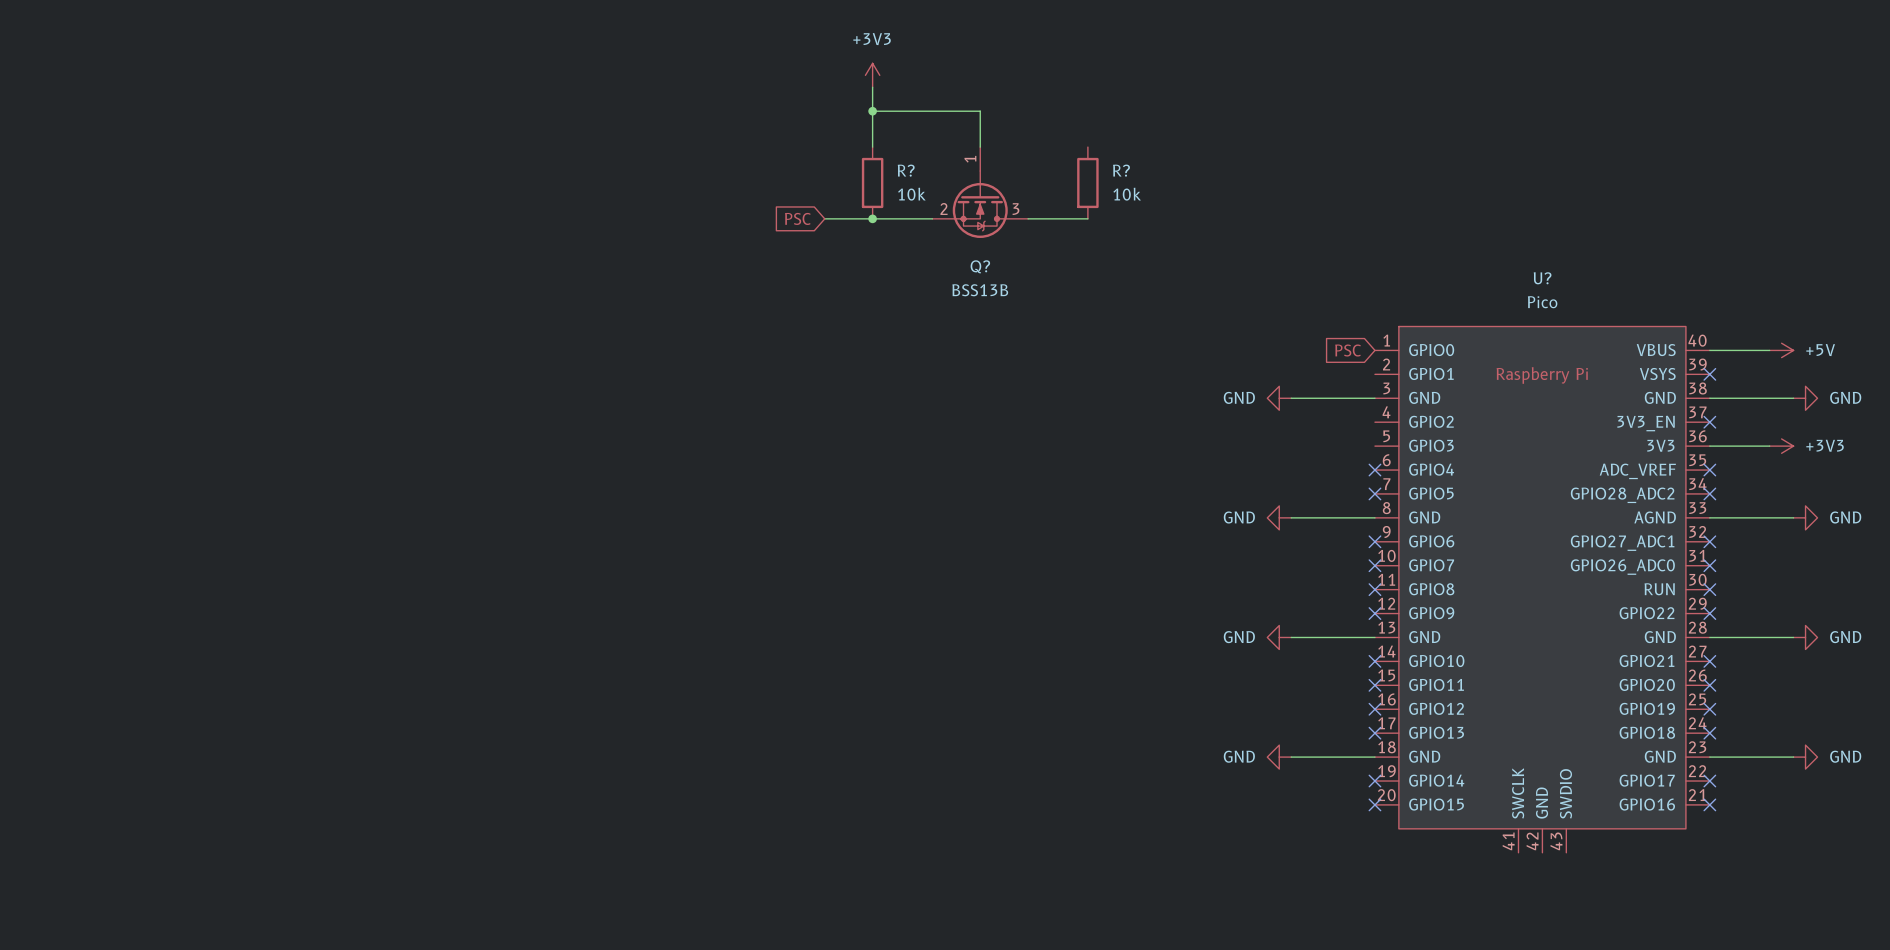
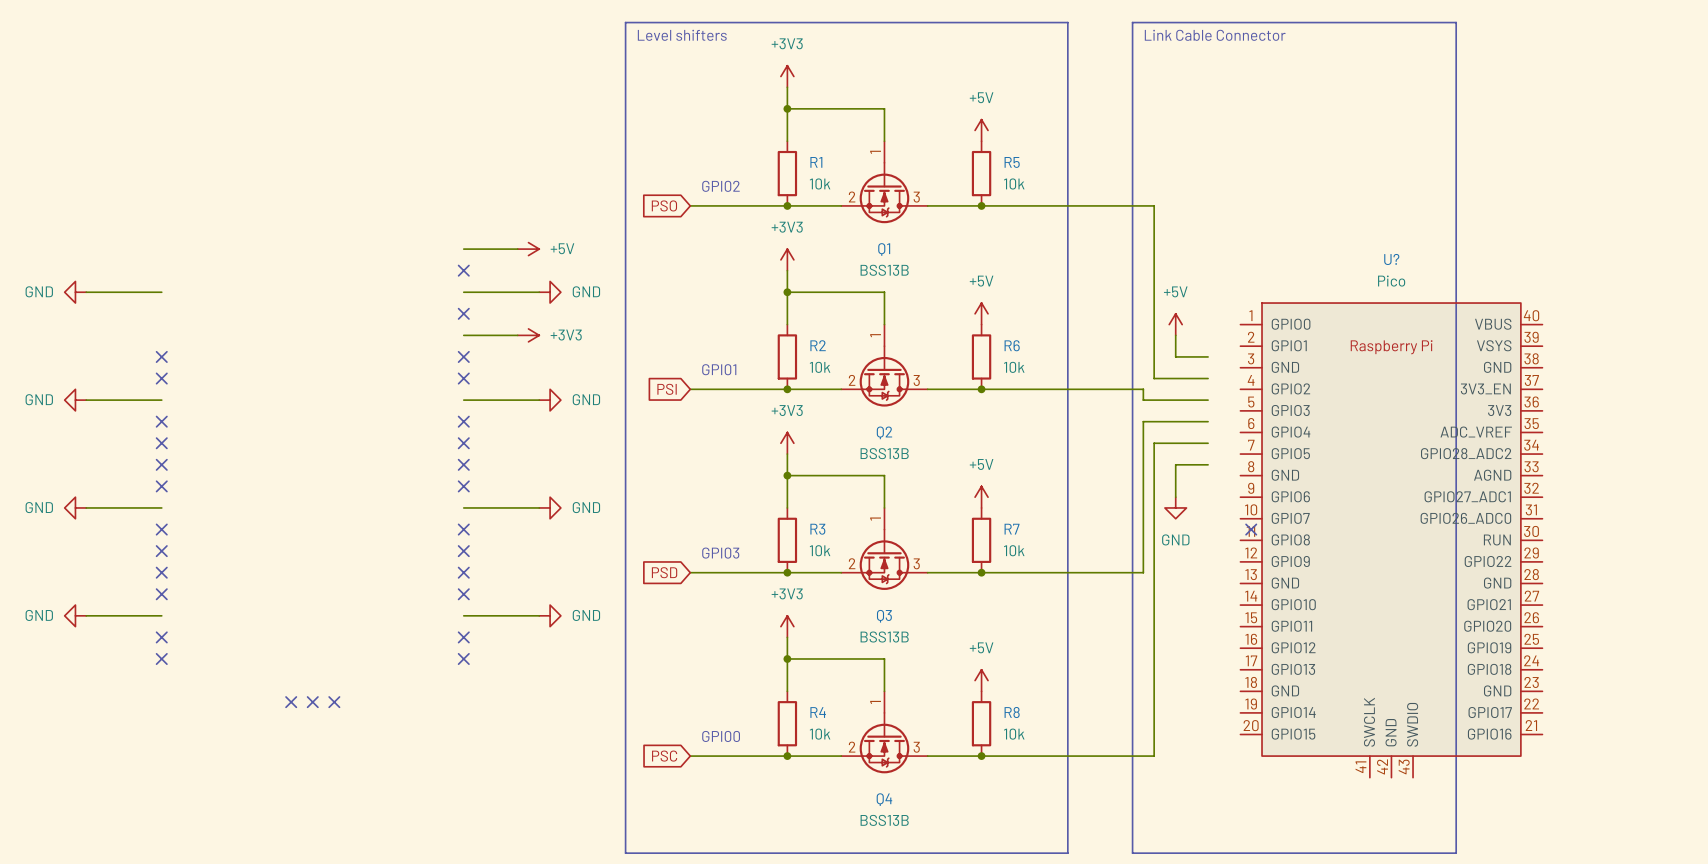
line: none -> (625, 22) (1067, 22) (1067, 853) (625, 853) (625, 22)
line: none -> (1132, 22) (1456, 22) (1456, 853) (1132, 853) (1132, 22)
text: none -> Level shifters (682, 35)
text: none -> Link Cable Connector (1215, 35)
power symbol: none -> +5V (981, 130)
R? name: R? (906, 170) -> R1 (816, 162)
R? name: R? (1121, 170) -> R5 (1012, 162)
text: none -> GPI02 (720, 186)
wire: none -> (690, 205) (744, 205)
global label: PSC (797, 218) -> PSO (664, 205)
wire: none -> (981, 205) (1154, 205) (1154, 378) (1208, 378)
junction: none -> (981, 205)
wire: none -> (463, 249) (517, 249)
power symbol: none -> +5V (528, 249)
Q? name: Q? (980, 266) -> Q1 (884, 249)
power symbol: none -> +3V3 (787, 259)
no-connect mark: none -> (463, 270)
wire: none -> (787, 270) (787, 324)
power symbol: none -> GND (75, 292)
wire: none -> (86, 292) (161, 292)
wire: none -> (463, 292) (539, 292)
power symbol: none -> GND (550, 292)
wire: none -> (787, 292) (884, 292) (884, 324)
junction: none -> (787, 292)
no-connect mark: none -> (463, 313)
power symbol: none -> +5V (981, 313)
power symbol: none -> +5V (1175, 324)
global label: PSC (1348, 350) -> none
wire: (1709, 350) (1769, 350) -> none
power symbol: +5V (1781, 350) -> none
wire: none -> (463, 335) (517, 335)
power symbol: none -> +3V3 (528, 335)
wire: none -> (1175, 335) (1175, 356) (1208, 356)
no-connect mark: (1709, 374) -> none
no-connect mark: none -> (161, 356)
no-connect mark: none -> (463, 356)
R2: none -> 10k (787, 356)
R6: none -> 10k (981, 356)
Q2: none -> BSS13B (884, 365)
power symbol: GND (1279, 398) -> none
wire: (1291, 398) (1374, 398) -> none
wire: (1709, 398) (1793, 398) -> none
power symbol: GND (1805, 398) -> none
text: none -> GPI01 (719, 369)
no-connect mark: none -> (161, 378)
no-connect mark: none -> (463, 378)
global label: none -> PSI (667, 389)
wire: none -> (690, 389) (841, 389)
junction: none -> (787, 389)
wire: none -> (927, 389) (1143, 389) (1143, 400) (1208, 400)
junction: none -> (981, 389)
no-connect mark: (1709, 422) -> none
power symbol: none -> GND (75, 400)
wire: none -> (86, 400) (161, 400)
wire: none -> (463, 400) (539, 400)
power symbol: none -> GND (550, 400)
wire: (1709, 446) (1769, 446) -> none
power symbol: +3V3 (1781, 446) -> none
no-connect mark: none -> (161, 421)
no-connect mark: none -> (463, 421)
wire: none -> (1208, 421) (1143, 421) (1143, 572) (927, 572)
no-connect mark: (1374, 470) -> none
no-connect mark: (1709, 470) -> none
no-connect mark: none -> (161, 443)
no-connect mark: none -> (463, 443)
power symbol: none -> +3V3 (787, 443)
wire: none -> (1208, 443) (1154, 443) (1154, 756) (927, 756)
wire: none -> (787, 454) (787, 507)
no-connect mark: (1374, 493) -> none
no-connect mark: (1709, 493) -> none
no-connect mark: none -> (161, 464)
no-connect mark: none -> (463, 464)
wire: none -> (1208, 464) (1175, 464) (1175, 497)
wire: none -> (787, 475) (884, 475) (884, 507)
junction: none -> (787, 475)
power symbol rotation: 0° (1279, 517) -> 90° counterclockwise (1175, 507)
power symbol position: GND (1279, 517) -> GND (1175, 507)
wire: (1291, 517) (1374, 517) -> none
wire: (1709, 517) (1793, 517) -> none
power symbol: GND (1805, 517) -> none
no-connect mark: none -> (161, 486)
no-connect mark: none -> (463, 486)
power symbol: none -> +5V (981, 497)
no-connect mark: (1374, 541) -> none
no-connect mark: (1709, 541) -> none
power symbol: none -> GND (75, 507)
wire: none -> (86, 507) (161, 507)
wire: none -> (463, 507) (539, 507)
power symbol: none -> GND (550, 507)
no-connect mark: (1374, 565) -> none
no-connect mark: (1709, 565) -> none
no-connect mark: none -> (161, 529)
no-connect mark: none -> (463, 529)
no-connect mark: none -> (1251, 529)
R3: none -> 10k (787, 540)
R7: none -> 10k (981, 540)
no-connect mark: (1374, 589) -> none
no-connect mark: (1709, 589) -> none
Q3: none -> BSS13B (884, 548)
no-connect mark: none -> (161, 551)
no-connect mark: none -> (463, 551)
text: none -> GPI03 (720, 553)
no-connect mark: (1374, 613) -> none
no-connect mark: (1709, 613) -> none
no-connect mark: none -> (161, 572)
no-connect mark: none -> (463, 572)
global label: none -> PSD (664, 572)
wire: none -> (690, 572) (841, 572)
junction: none -> (787, 572)
junction: none -> (981, 572)
power symbol: GND (1279, 637) -> none
wire: (1291, 637) (1374, 637) -> none
wire: (1709, 637) (1793, 637) -> none
power symbol: GND (1805, 637) -> none
no-connect mark: none -> (161, 594)
no-connect mark: none -> (463, 594)
no-connect mark: (1374, 661) -> none
no-connect mark: (1709, 661) -> none
power symbol: none -> GND (75, 615)
wire: none -> (86, 615) (161, 615)
wire: none -> (463, 615) (539, 615)
power symbol: none -> GND (550, 615)
power symbol: none -> +3V3 (787, 626)
no-connect mark: (1374, 685) -> none
no-connect mark: (1709, 685) -> none
no-connect mark: none -> (161, 637)
no-connect mark: none -> (463, 637)
wire: none -> (787, 637) (787, 691)
no-connect mark: (1374, 709) -> none
no-connect mark: (1709, 709) -> none
no-connect mark: none -> (161, 658)
no-connect mark: none -> (463, 658)
wire: none -> (787, 658) (884, 658) (884, 691)
junction: none -> (787, 658)
no-connect mark: (1374, 733) -> none
no-connect mark: (1709, 733) -> none
power symbol: none -> +5V (981, 680)
power symbol: GND (1279, 757) -> none
wire: (1291, 757) (1374, 757) -> none
wire: (1709, 757) (1793, 757) -> none
power symbol: GND (1805, 757) -> none
no-connect mark: none -> (291, 702)
no-connect mark: none -> (312, 702)
no-connect mark: none -> (334, 702)
no-connect mark: (1374, 781) -> none
no-connect mark: (1709, 781) -> none
R4: none -> 10k (787, 723)
R8: none -> 10k (981, 723)
Q4: none -> BSS13B (884, 732)
no-connect mark: (1374, 804) -> none
no-connect mark: (1709, 804) -> none
text: none -> GPI00 (721, 736)
global label: none -> PSC (664, 756)
wire: none -> (690, 756) (841, 756)
junction: none -> (787, 756)
junction: none -> (981, 756)

